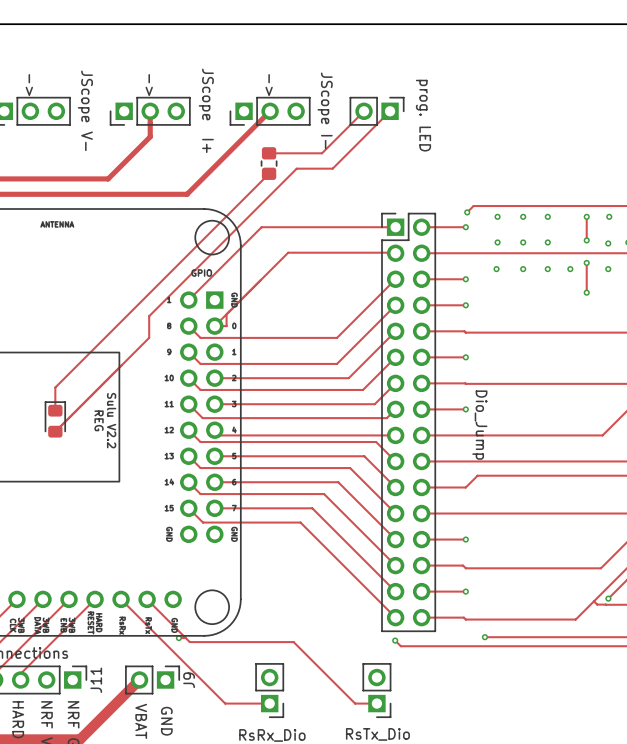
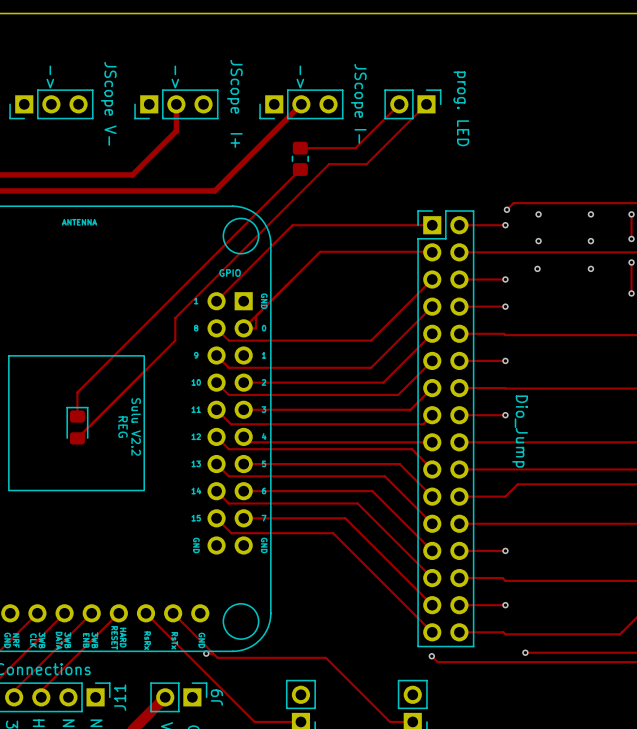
via: (523, 216) -> none
via: (523, 242) -> none
via: (523, 269) -> none
via: (570, 269) -> none

